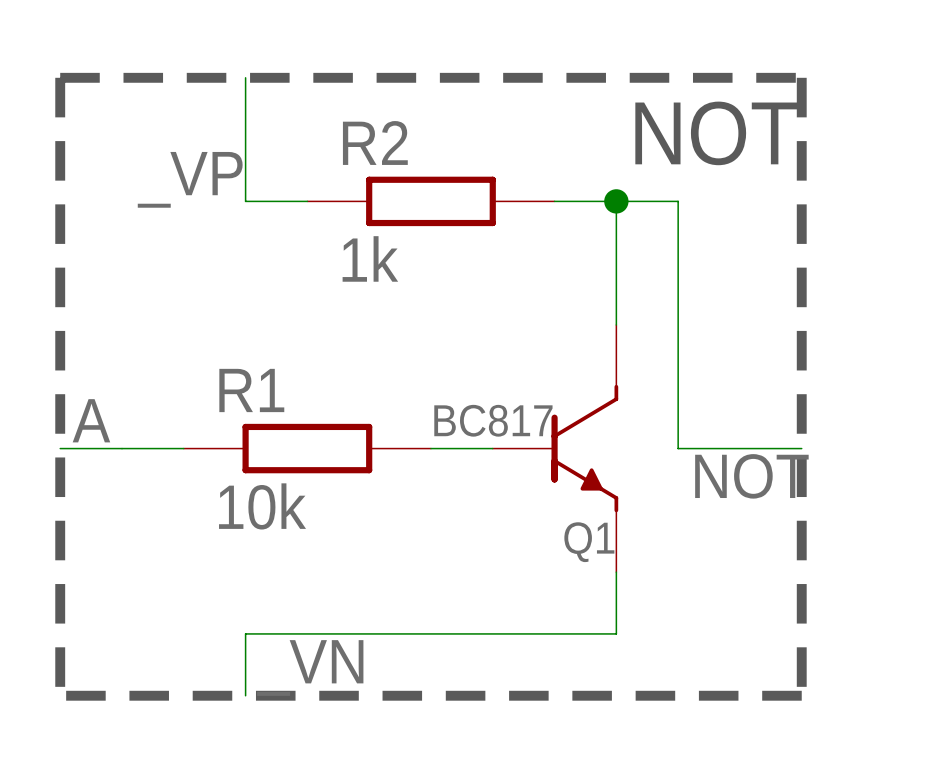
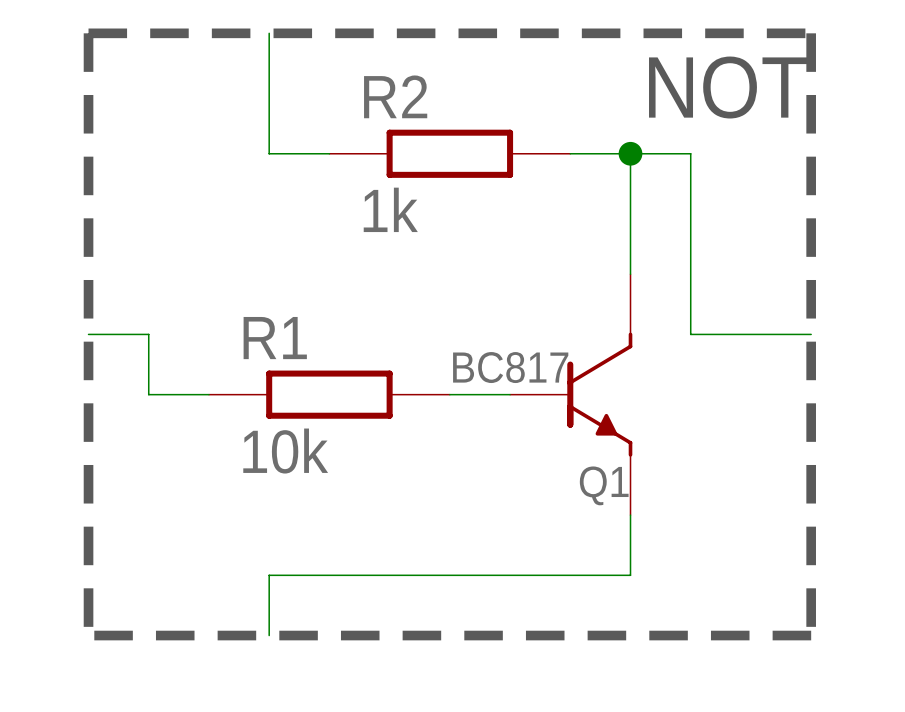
label: _VP (190, 179) -> none
wire: (678, 386) (678, 448) (801, 448) -> (690, 334) (811, 334)
label: A (91, 420) -> none
wire: (60, 448) (122, 448) -> (88, 334) (148, 334) (148, 394)
label: NOT (751, 476) -> none
label: _VN (310, 668) -> none

